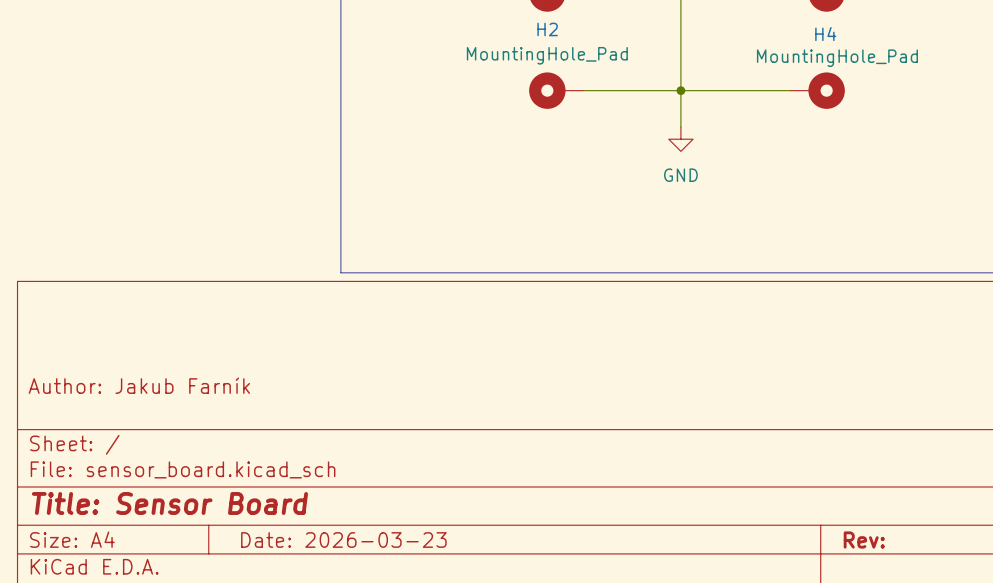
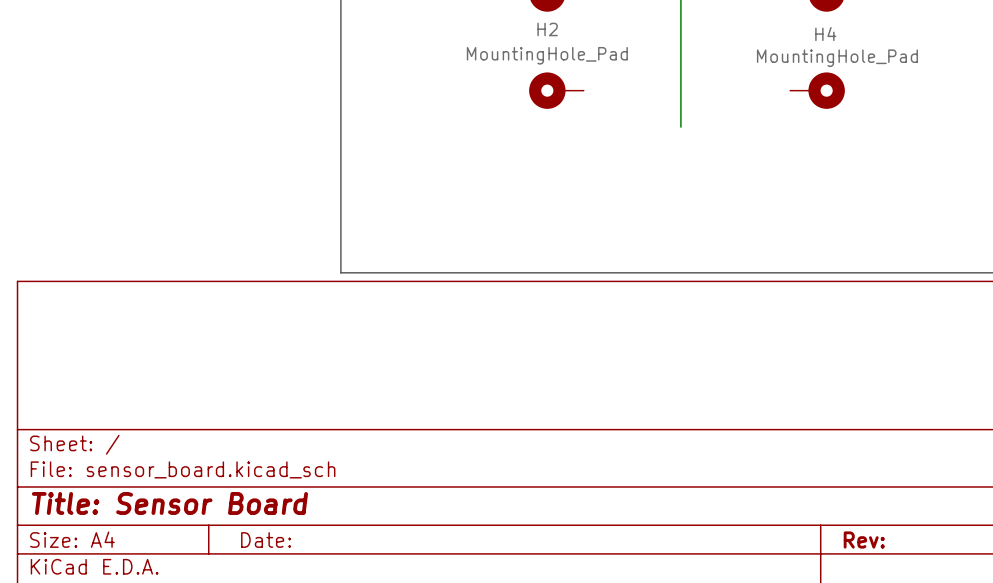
wire: (583, 90) (790, 90) -> none
junction: (680, 90) -> none
power symbol: GND (680, 139) -> none
title block: Author: Jakub Farník (139, 385) -> none
title block: Date: 2026-03-23 (343, 540) -> Date: (266, 540)

